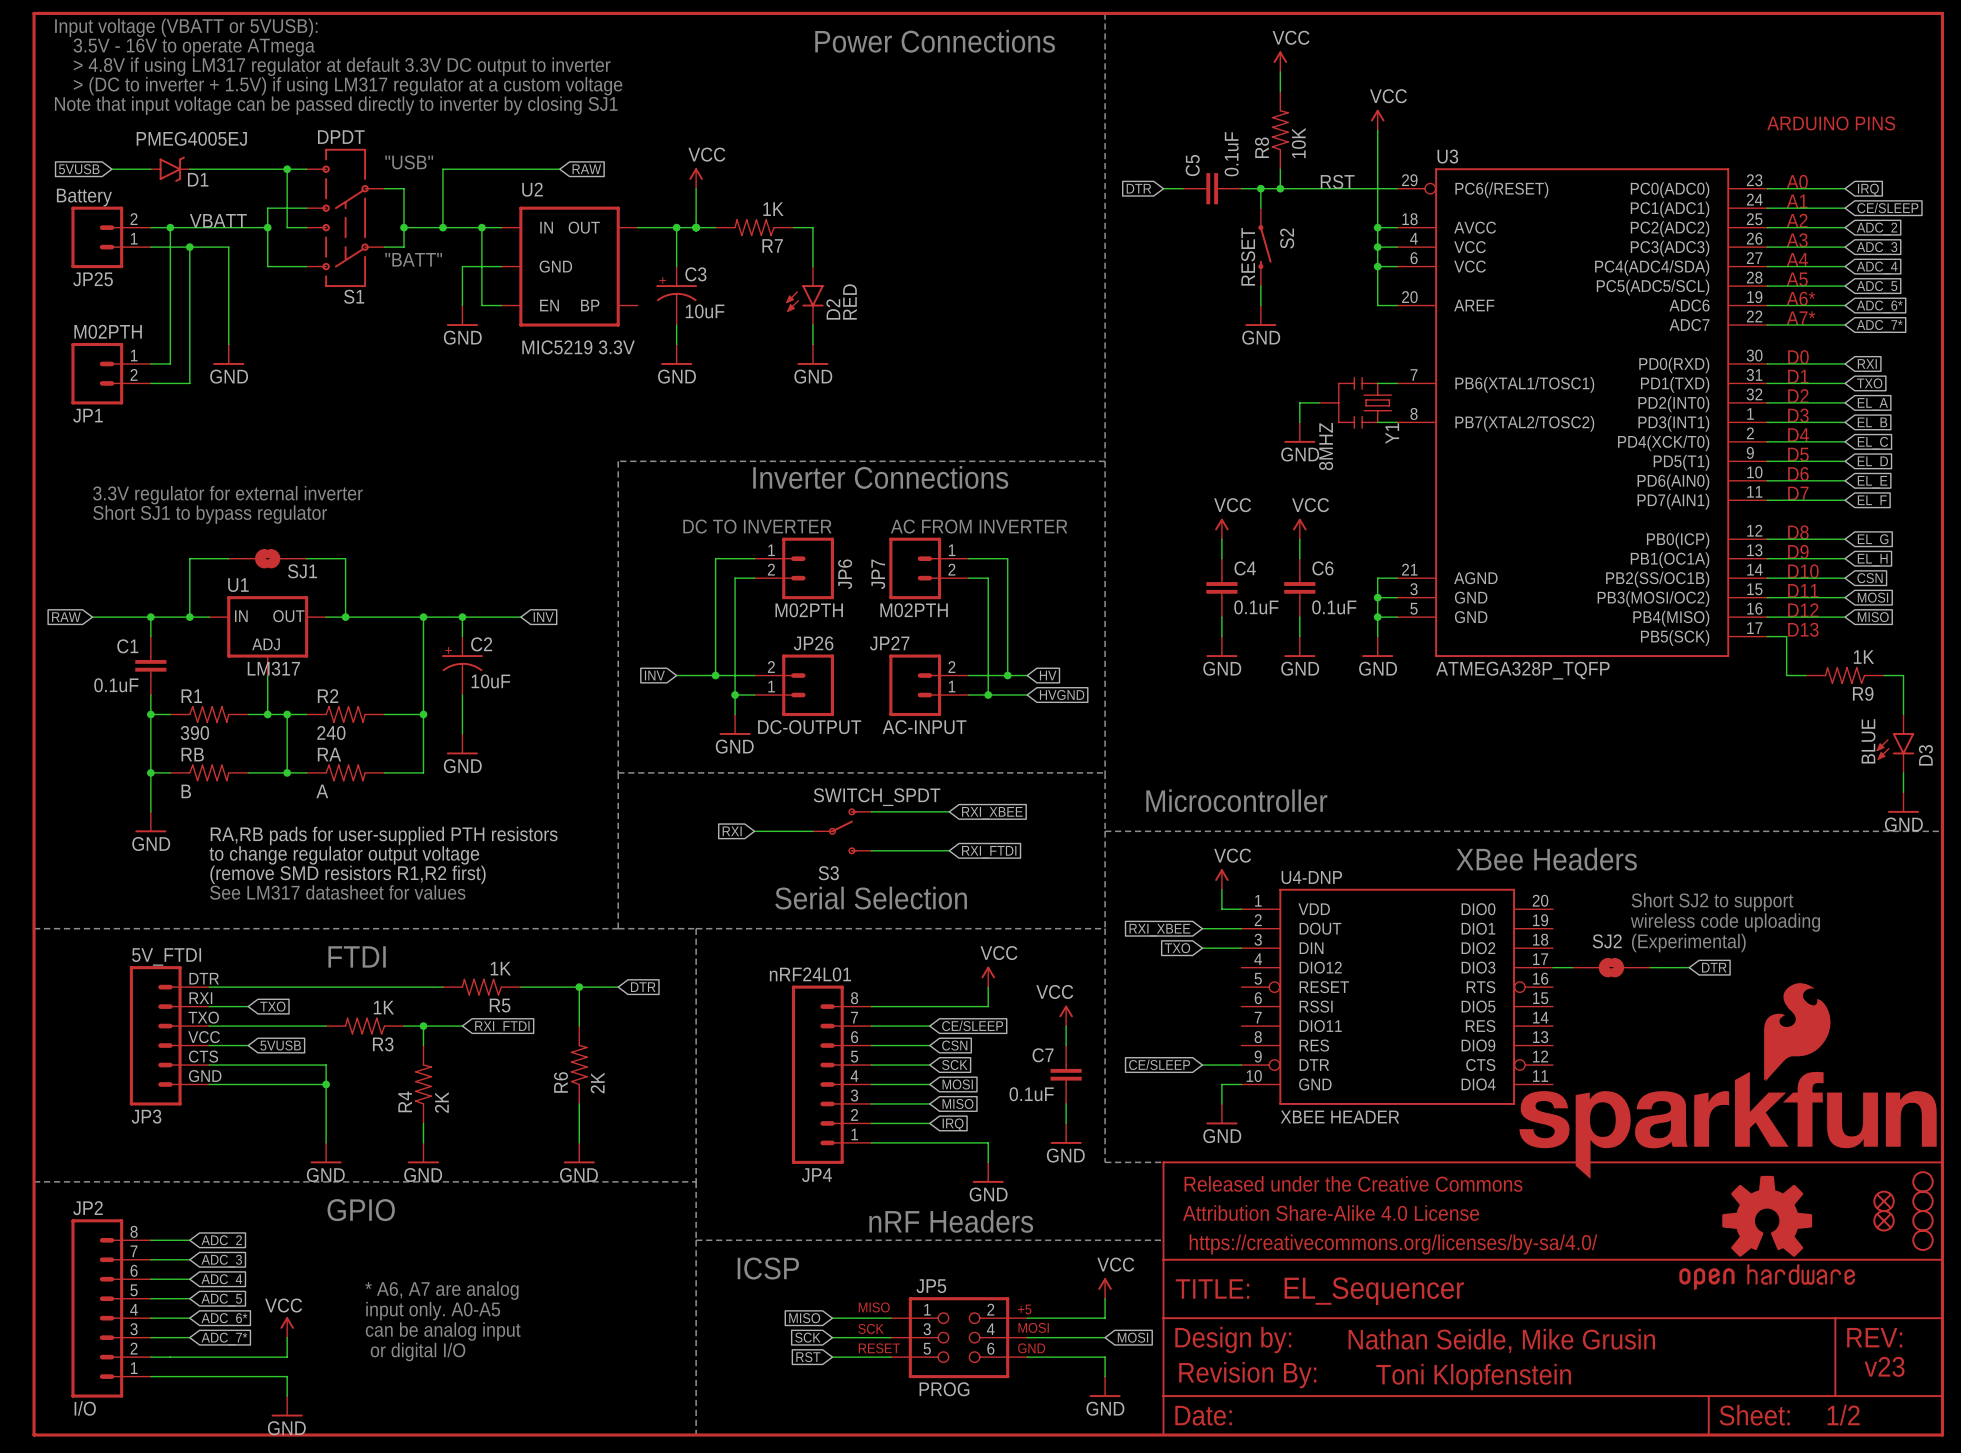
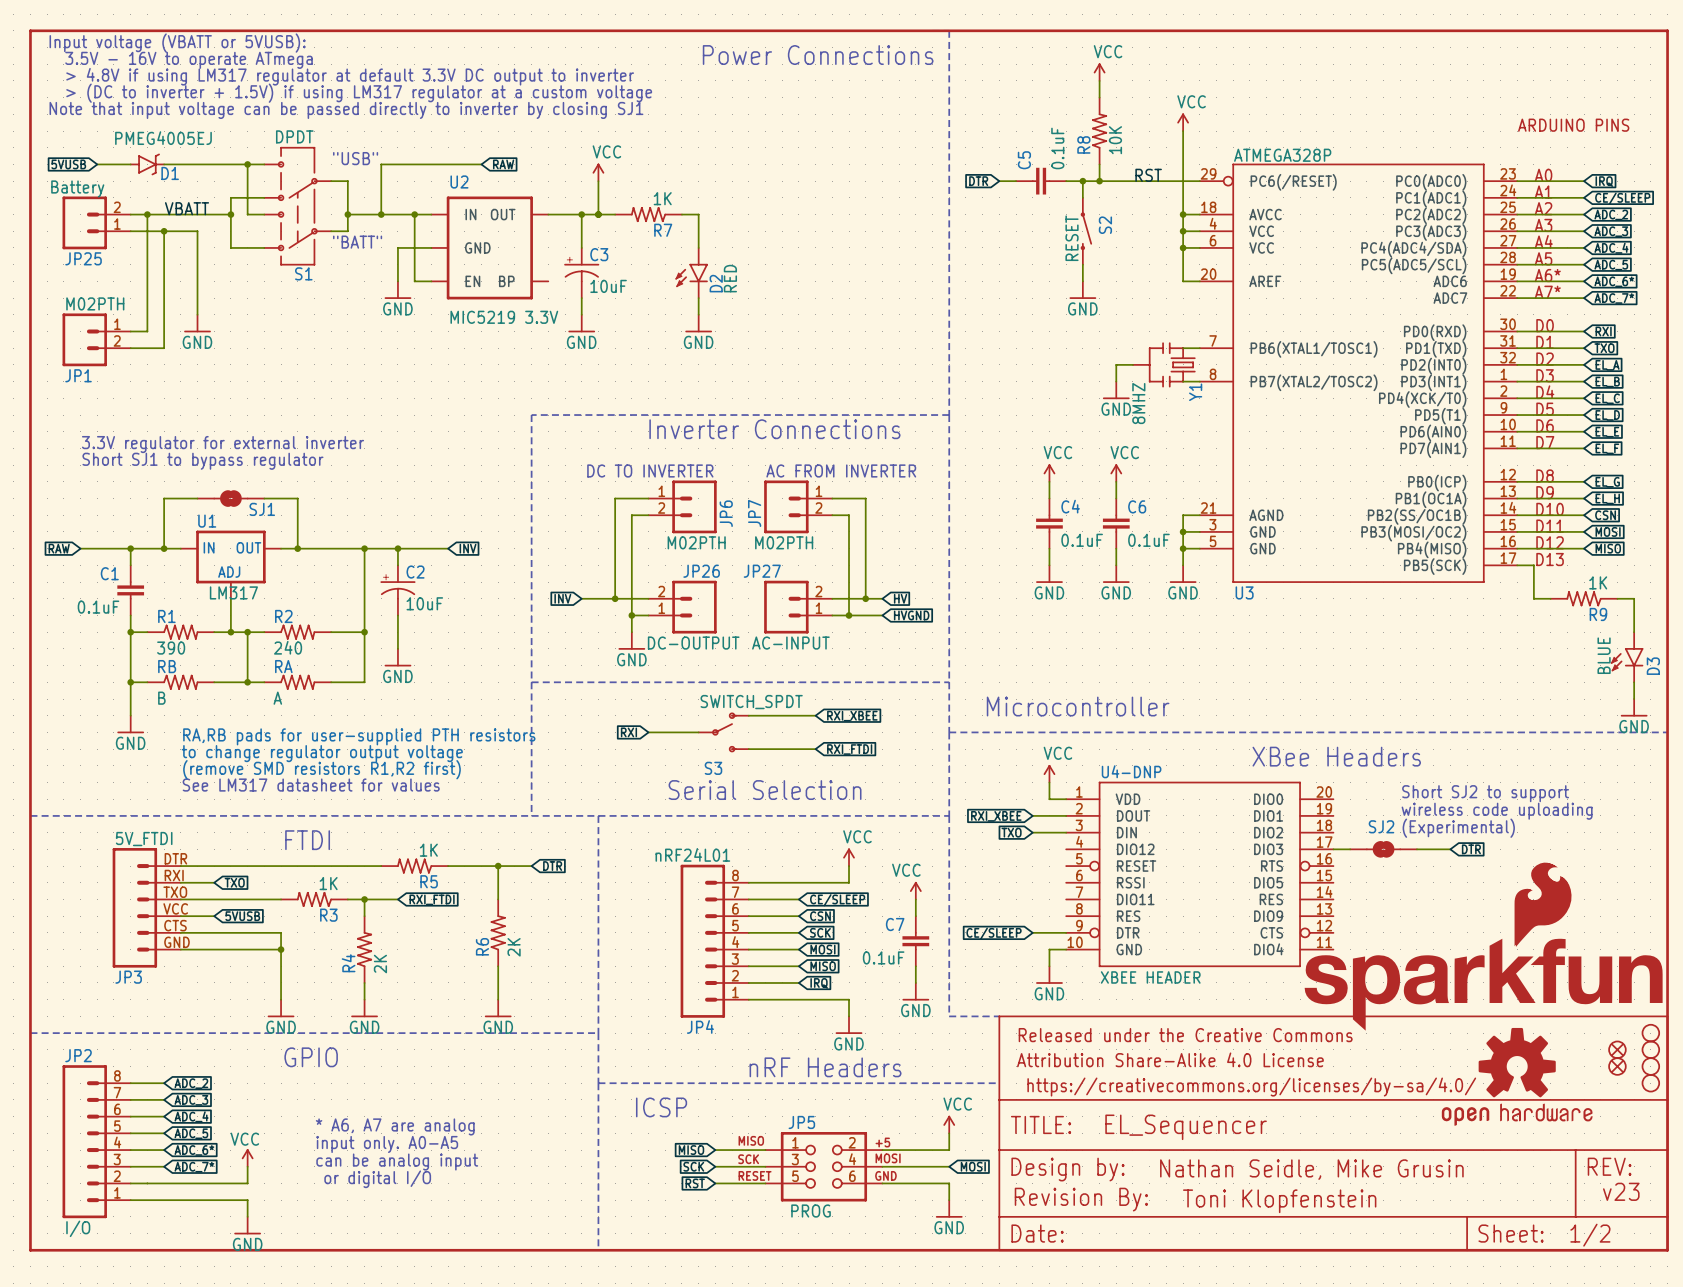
U3 name position: U3 (1447, 156) -> U3 (1244, 592)
U3 value: ATMEGA328P_TQFP (1522, 670) -> ATMEGA328P (1282, 155)

